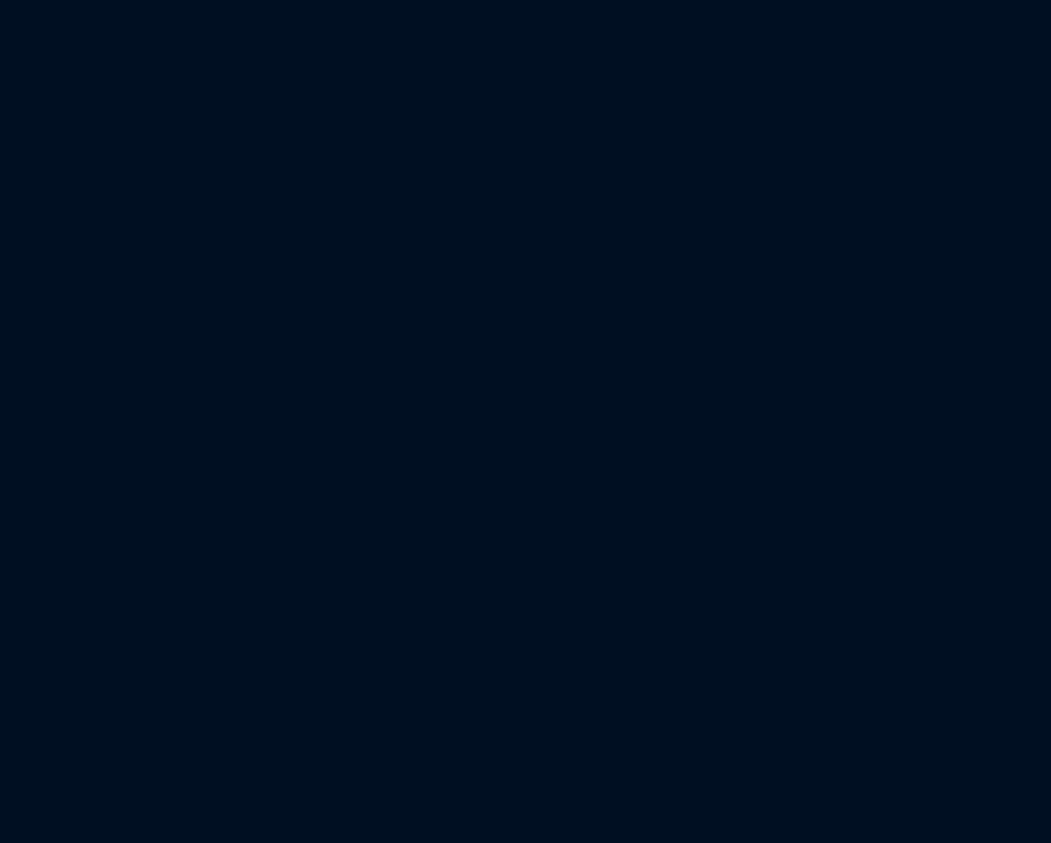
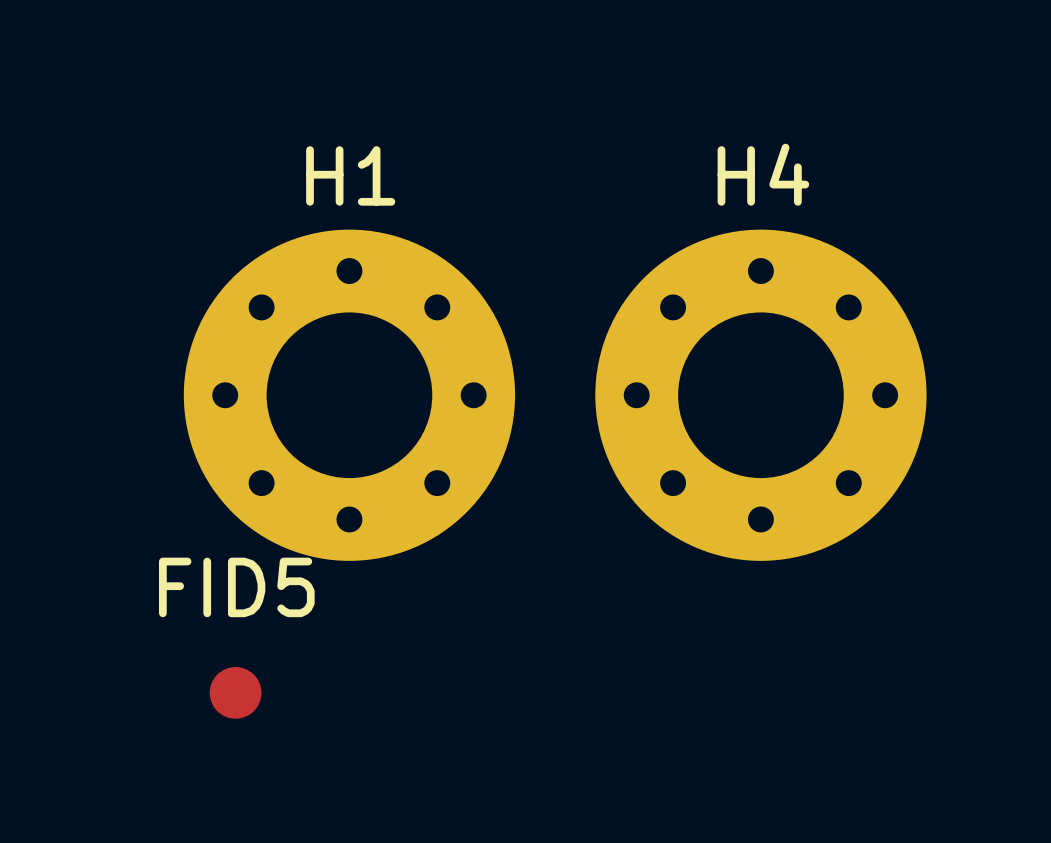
H1: none -> (349, 395)
H4: none -> (760, 395)
FID5: none -> (235, 692)

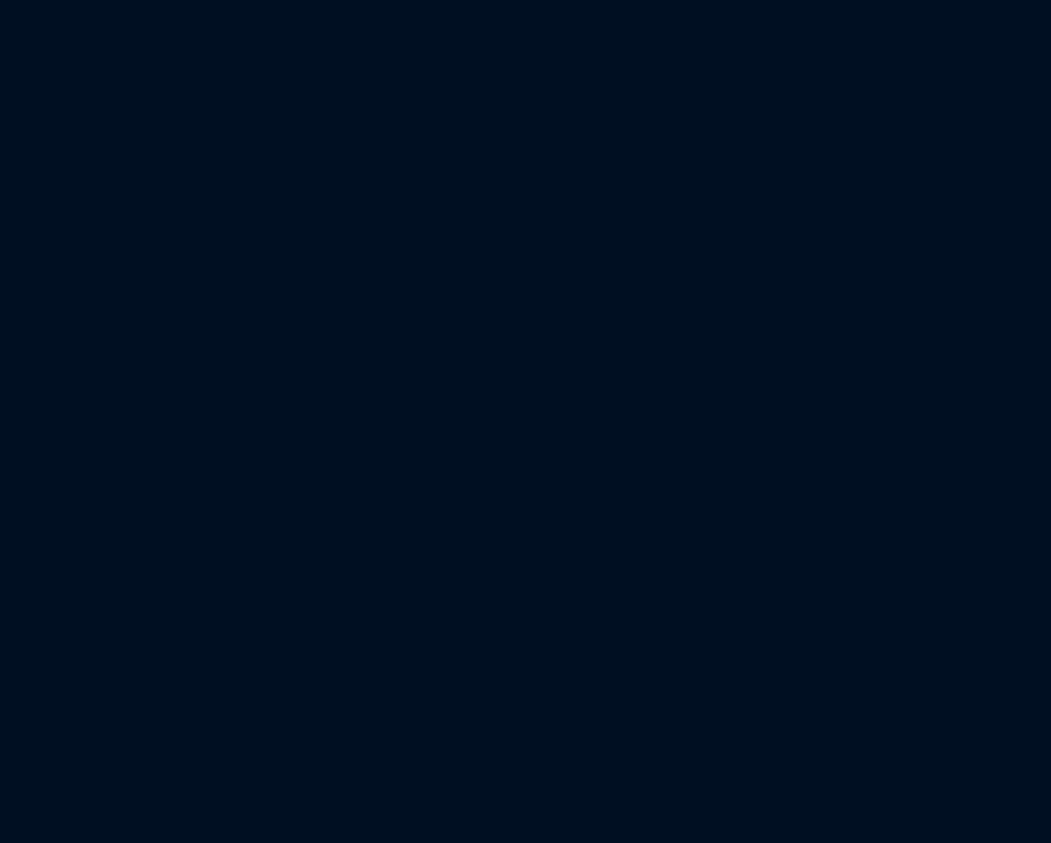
H1: (349, 395) -> none
H4: (760, 395) -> none
FID5: (235, 692) -> none

